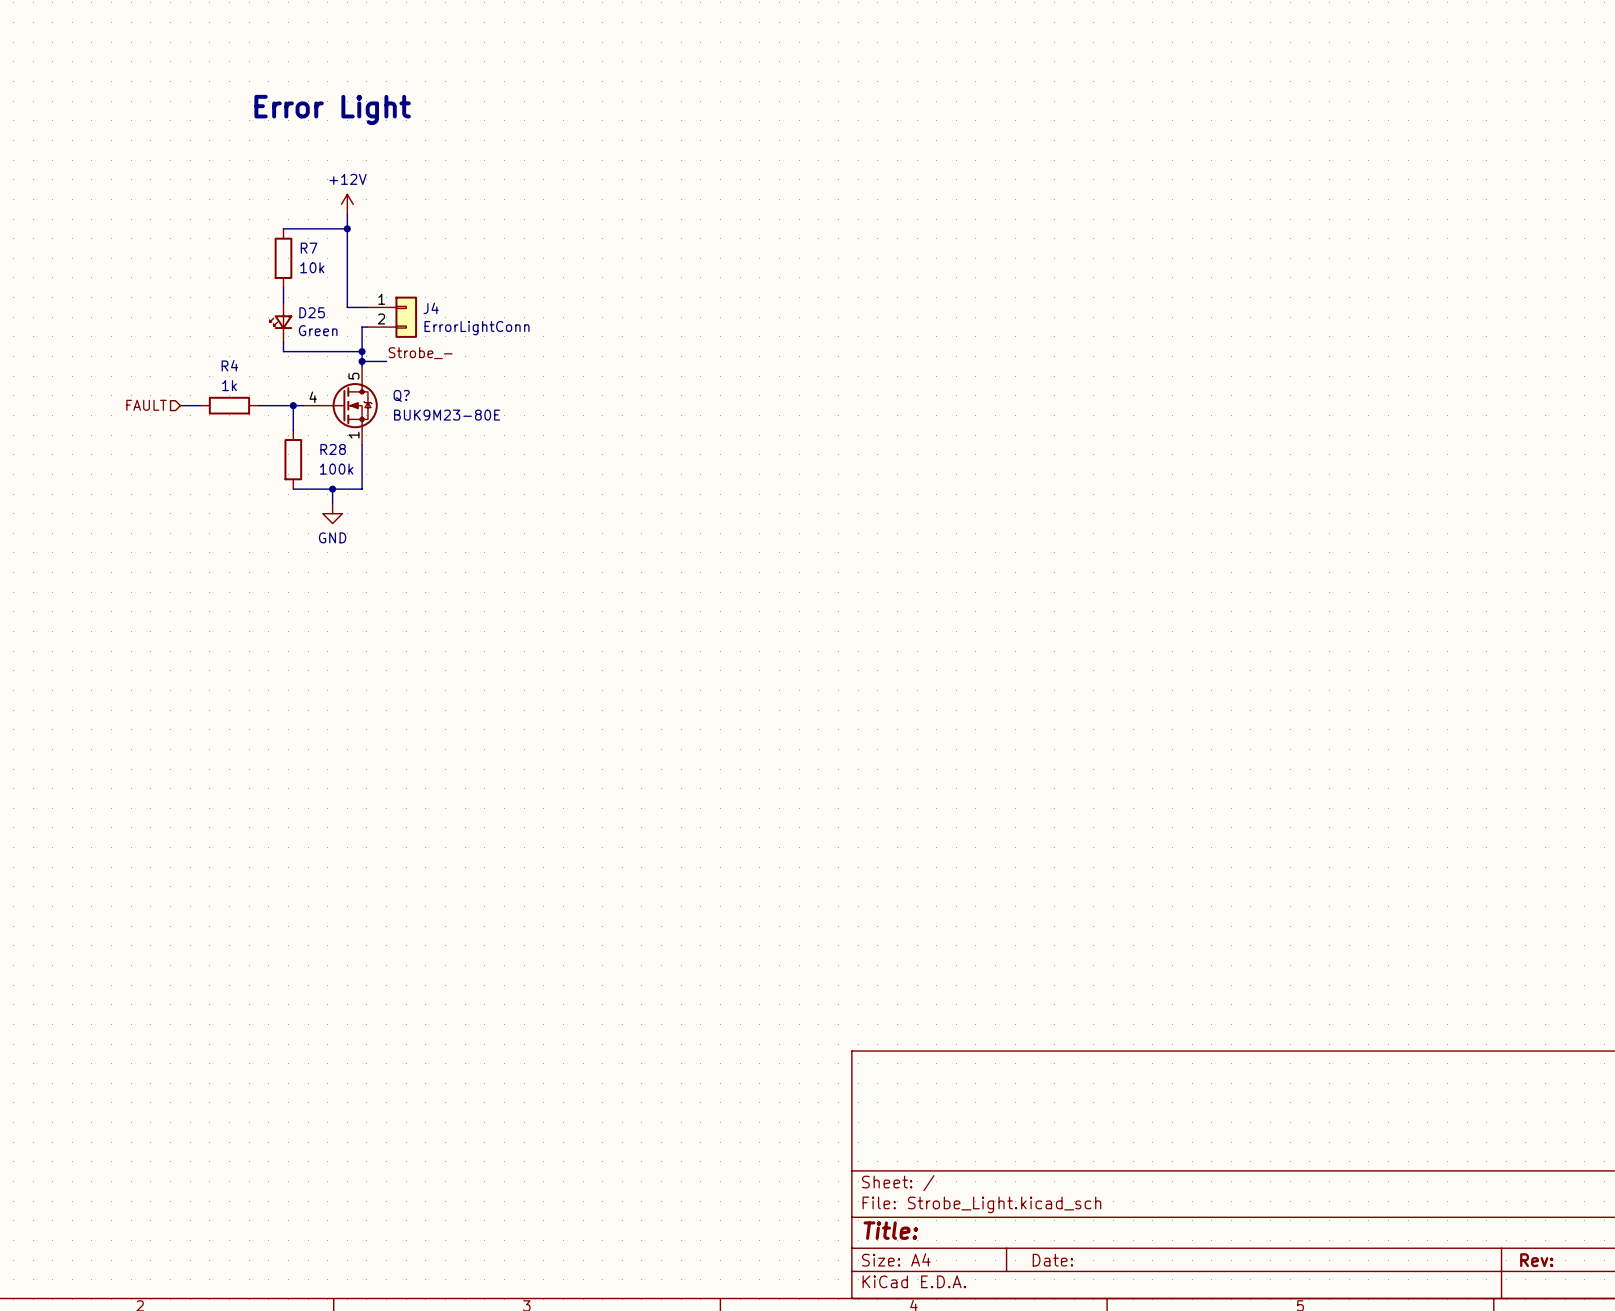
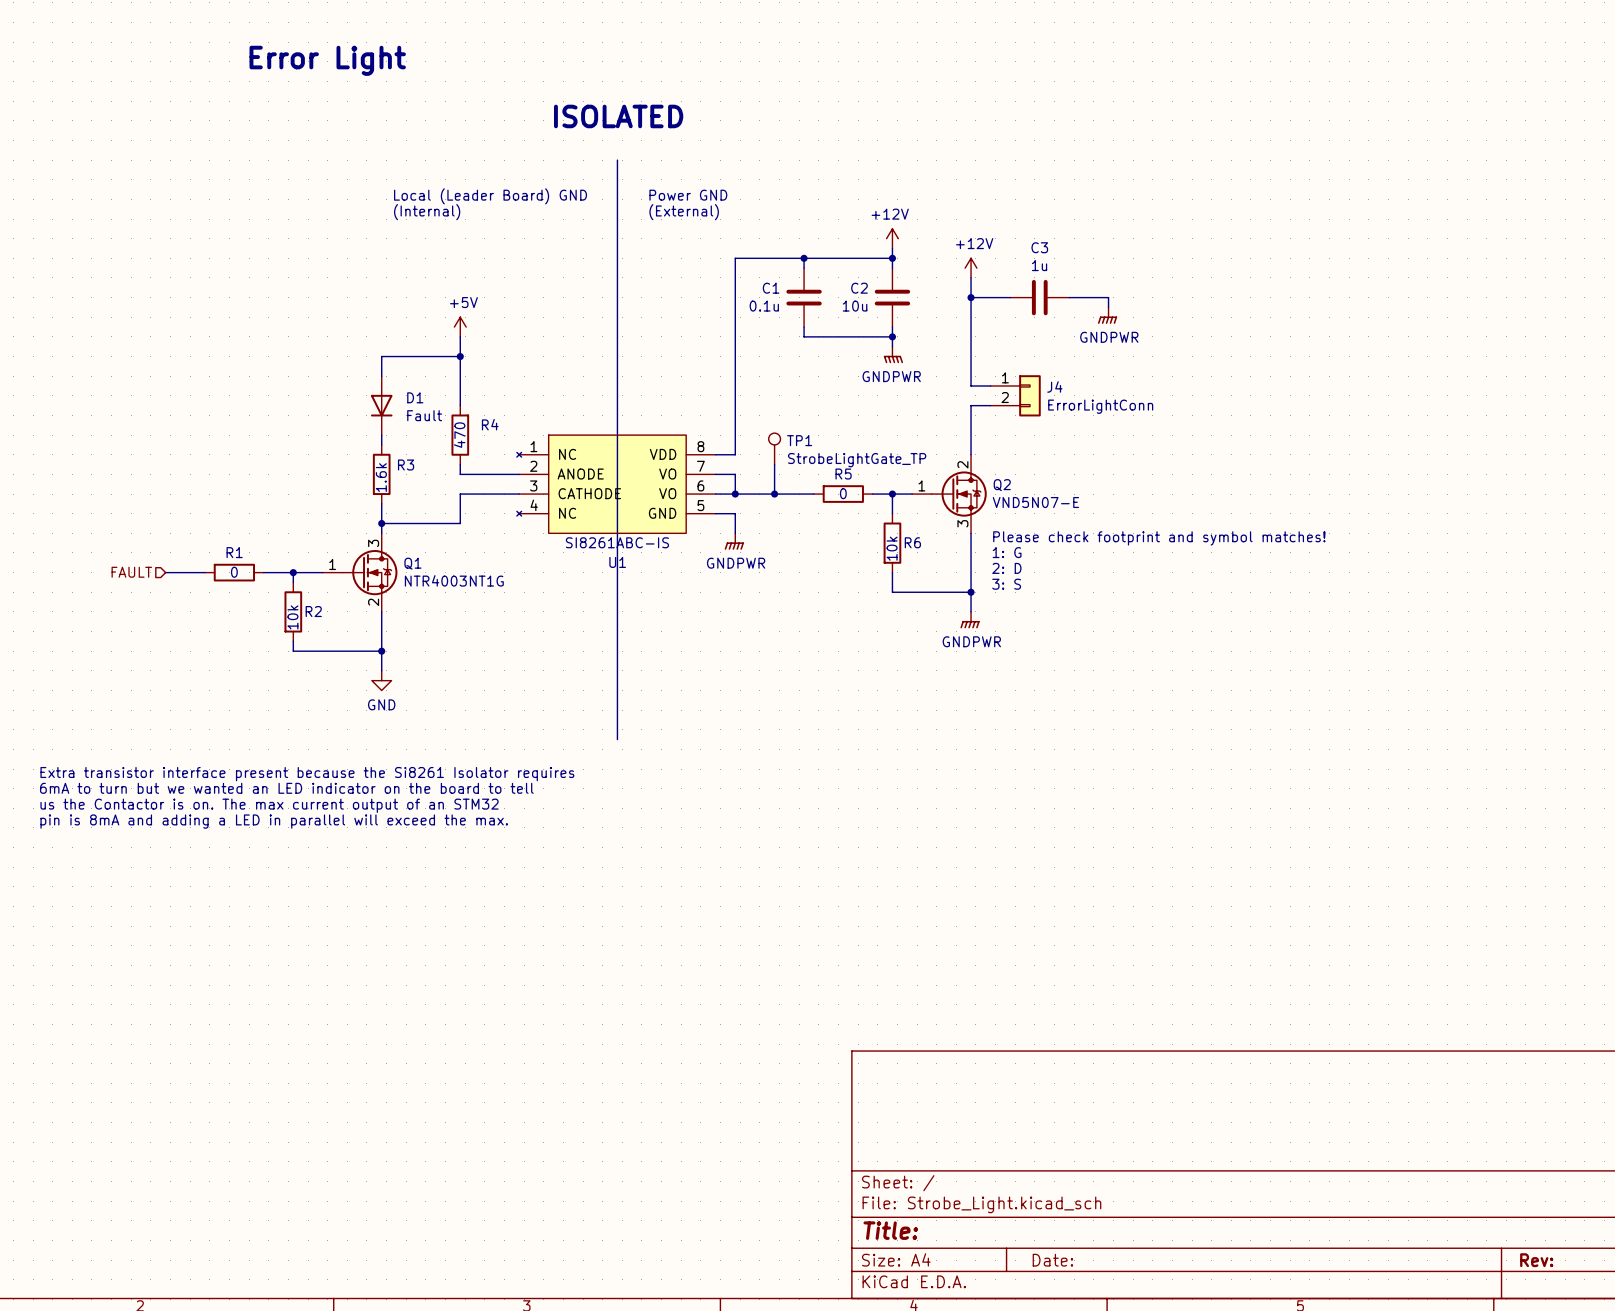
text position: Error Light (332, 109) -> Error Light (327, 60)
text: none -> ISOLATED (618, 116)
line: none -> (617, 160) (617, 739)
text: none -> Power GND (688, 195)
text: none -> Local (Leader Board) GND (490, 196)
power symbol: +12V (347, 204) -> none
text: none -> (Internal) (427, 212)
text: none -> (External) (684, 212)
wire: (347, 214) (347, 307) (366, 307) -> none
wire: (283, 228) (347, 228) -> none
junction: (347, 228) -> none
power symbol: none -> +12V (892, 238)
wire: none -> (892, 248) (892, 268)
R7: 10k (283, 258) -> none
wire: none -> (804, 258) (804, 268)
junction: none -> (804, 258)
wire: none -> (892, 258) (735, 258) (735, 454) (715, 454)
junction: none -> (892, 258)
power symbol: none -> +12V (971, 268)
wire: none -> (971, 277) (971, 386) (990, 386)
wire: (283, 287) (283, 302) -> none
C1: none -> 0.1u (804, 297)
C2: none -> 10u (892, 297)
wire: none -> (971, 297) (1010, 297)
junction: none -> (971, 297)
C3: none -> 1u (1039, 297)
wire: none -> (1069, 297) (1108, 297) (1108, 307)
power symbol: none -> GNDPWR (1107, 315)
J4 position: (392, 317) -> (1015, 395)
D25: Green (281, 322) -> none
wire: (366, 327) (362, 327) (362, 366) -> none
power symbol: none -> +5V (460, 327)
wire: none -> (804, 327) (804, 336) (892, 336)
wire: none -> (892, 327) (892, 346)
wire: none -> (460, 336) (460, 405)
junction: none -> (892, 336)
wire: (283, 341) (283, 351) (362, 351) -> none
junction: (362, 351) -> none
label: Strobe_- (420, 353) -> none
power symbol: none -> GNDPWR (893, 354)
wire: none -> (460, 356) (381, 356) (381, 376)
junction: none -> (460, 356)
wire: (362, 361) (386, 361) -> none
junction: (362, 361) -> none
R4 value: 1k (229, 385) -> 470 (459, 435)
hierarchical label position: FAULT (146, 405) -> FAULT (131, 572)
wire: (180, 405) (200, 405) -> none
R4 rotation: 0° (229, 405) -> 90° clockwise (460, 435)
R4 position: (229, 405) -> (460, 435)
wire: (258, 405) (303, 405) -> none
wire: (293, 405) (293, 430) -> none
junction: (293, 405) -> none
Q?: BUK9M23-80E (340, 405) -> none
D1: none -> Fault (381, 405)
wire: none -> (990, 405) (971, 405) (971, 454)
wire: none -> (381, 435) (381, 444)
wire: (362, 444) (362, 489) (293, 489) -> none
TP1: none -> StrobeLightGate_TP (774, 448)
R28: 100k (293, 459) -> none
wire: none -> (460, 464) (460, 474) (519, 474)
wire: none -> (774, 464) (774, 494)
R3: none -> 1.6k (381, 474)
wire: none -> (715, 474) (735, 474) (735, 494)
U1: none -> SI8261ABC-IS (616, 484)
wire: (332, 489) (332, 503) -> none
junction: (332, 489) -> none
wire: none -> (519, 494) (460, 494) (460, 523) (381, 523)
wire: none -> (715, 494) (813, 494)
junction: none -> (735, 494)
junction: none -> (774, 494)
R5: none -> 0 (843, 494)
wire: none -> (872, 494) (912, 494)
wire: none -> (892, 494) (892, 513)
junction: none -> (892, 494)
Q2: none -> VND5N07-E (949, 494)
wire: none -> (381, 503) (381, 533)
power symbol position: GND (332, 513) -> GND (381, 680)
wire: none -> (715, 513) (735, 513) (735, 533)
junction: none -> (381, 523)
wire: none -> (971, 533) (971, 611)
text: none -> Please check footprint and symbol matches! (1159, 538)
power symbol: none -> GNDPWR (734, 541)
R6: none -> 10k (892, 543)
text: none -> 1: G (1007, 552)
text: none -> 2: D (1006, 568)
wire: none -> (165, 572) (204, 572)
R1: none -> 0 (234, 572)
wire: none -> (263, 572) (322, 572)
wire: none -> (293, 572) (293, 582)
junction: none -> (293, 572)
Q1: none -> NTR4003NT1G (360, 572)
wire: none -> (892, 572) (892, 592) (971, 592)
text: none -> 3: S (1006, 584)
junction: none -> (971, 592)
R2: none -> 10k (293, 611)
wire: none -> (381, 611) (381, 670)
power symbol: none -> GNDPWR (970, 620)
wire: none -> (293, 641) (293, 651) (381, 651)
junction: none -> (381, 651)
text: none -> Extra transistor interface present because the Si8261 Isolator requires (307, 774)
text: none -> 6mA to turn but we wanted an LED indicator on the board to tell (286, 788)
text: none -> us the Contactor is on. The max current output of an STM32 (269, 805)
text: none -> pin is 8mA and adding a LED in parallel will exceed the max. (274, 821)

